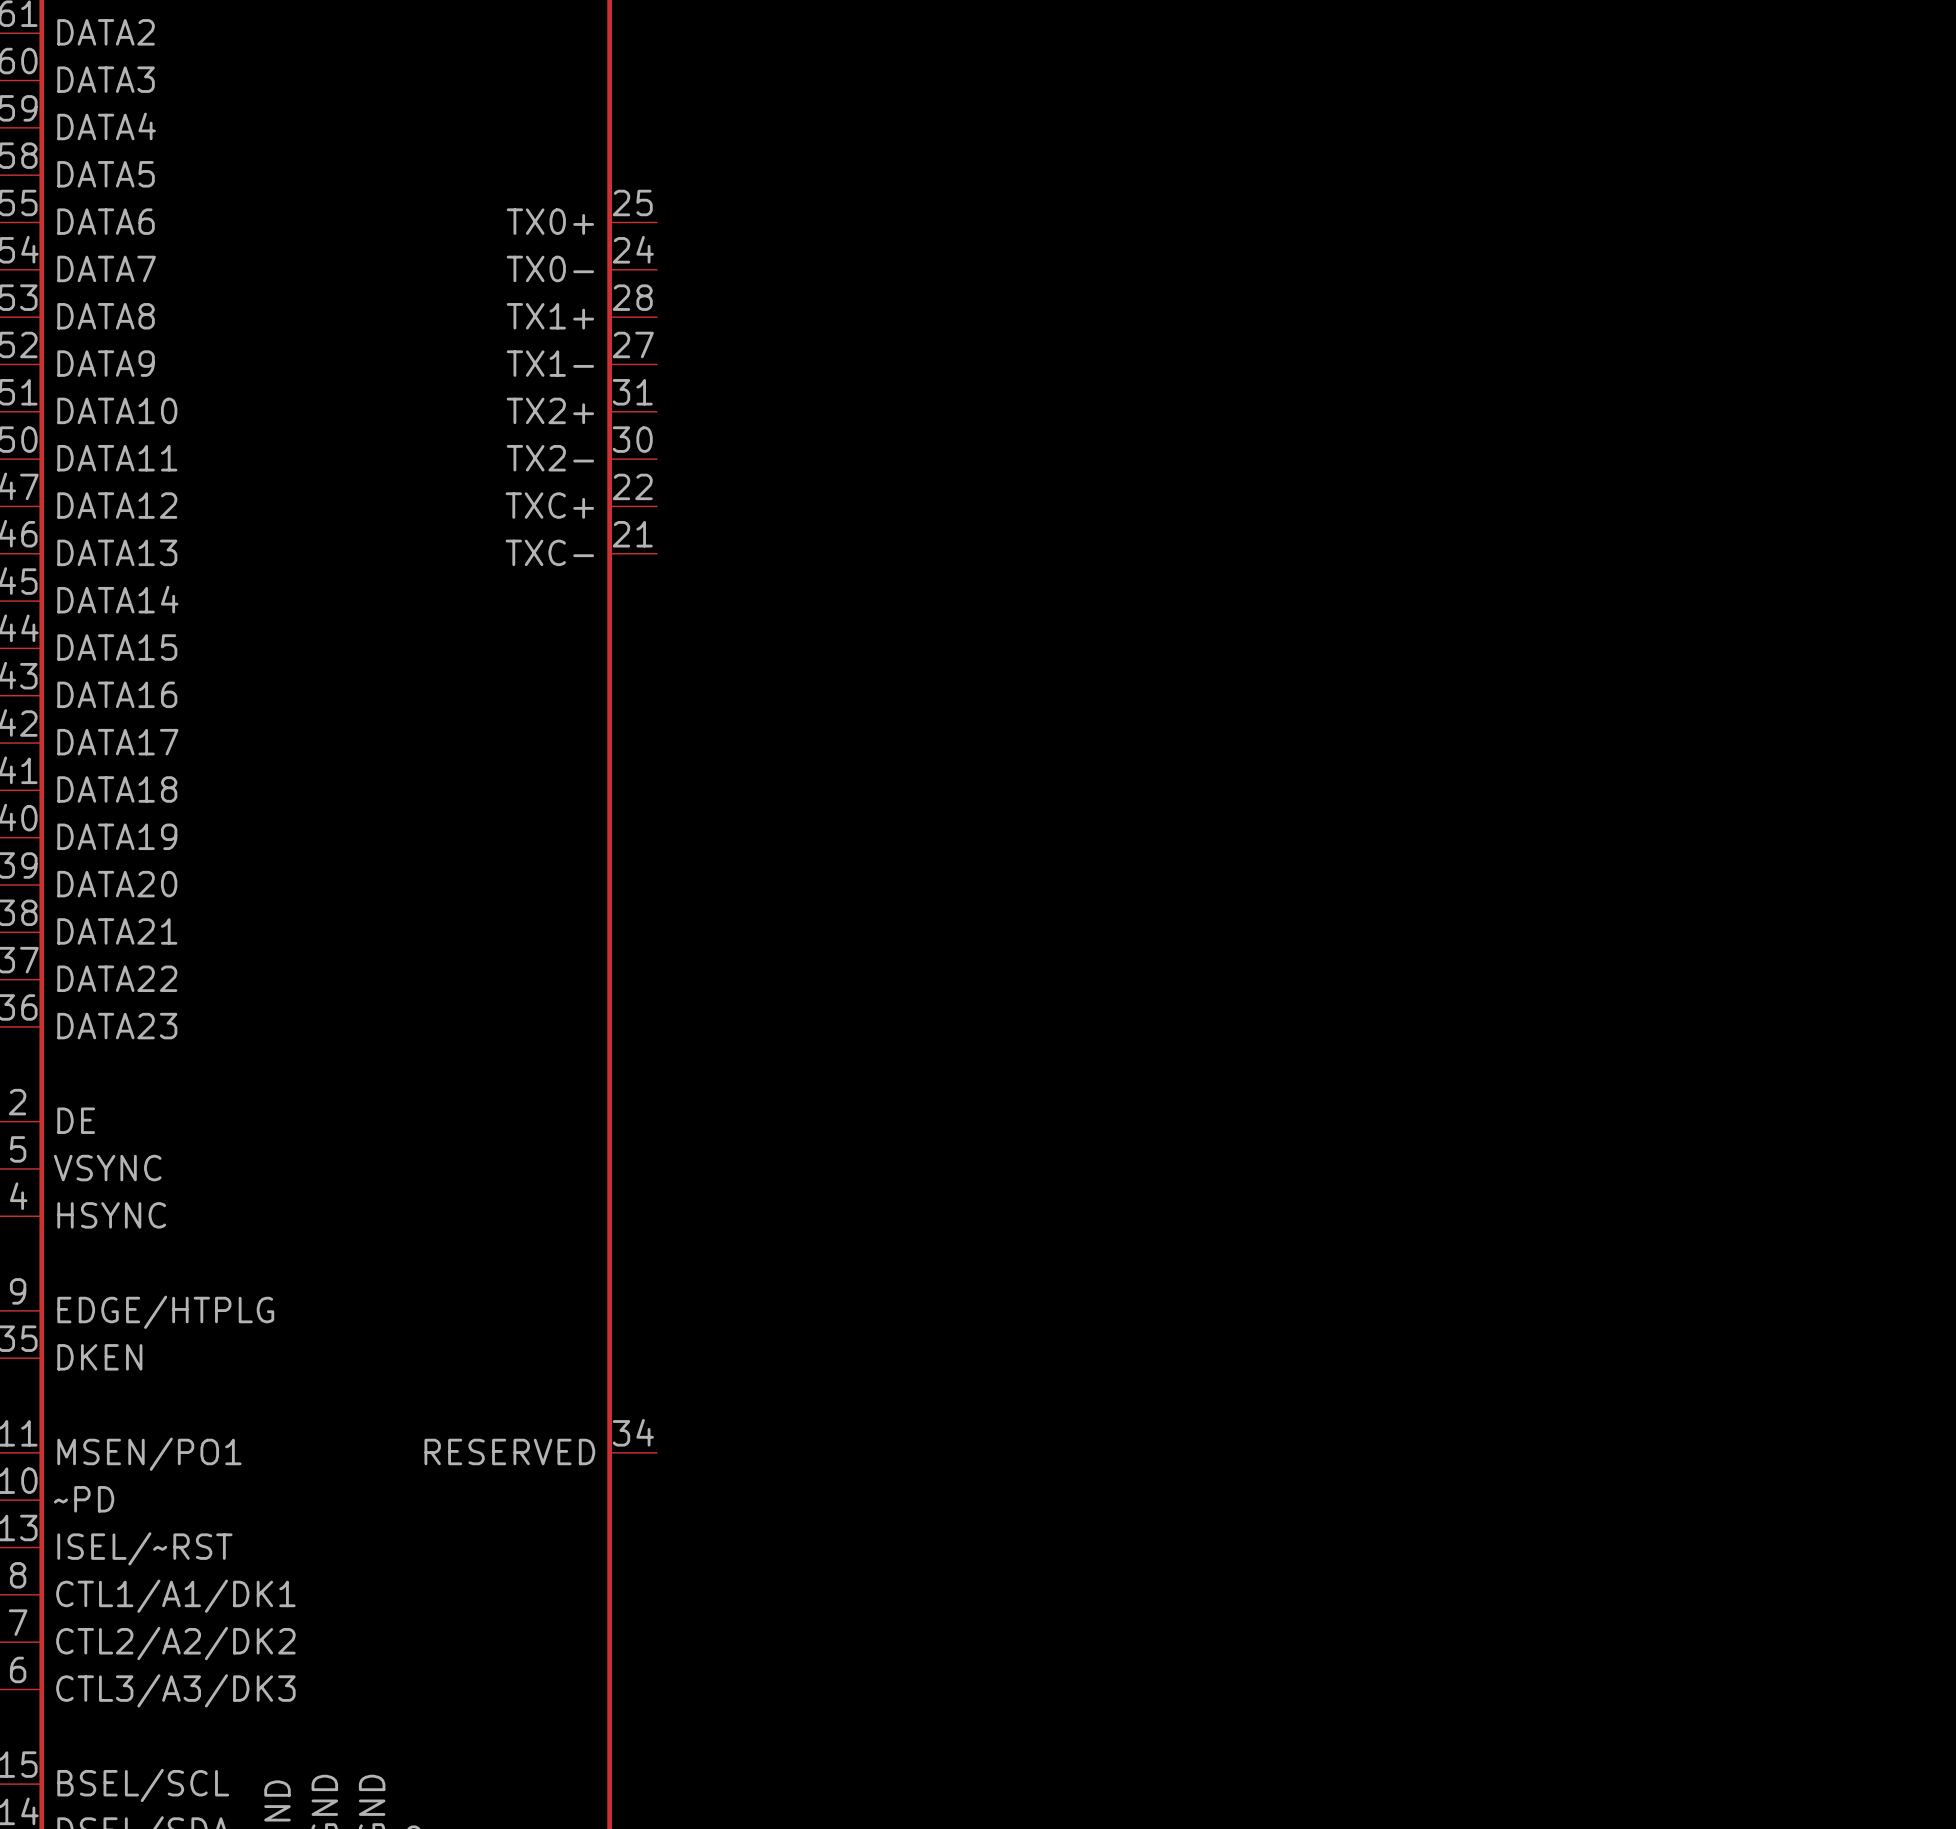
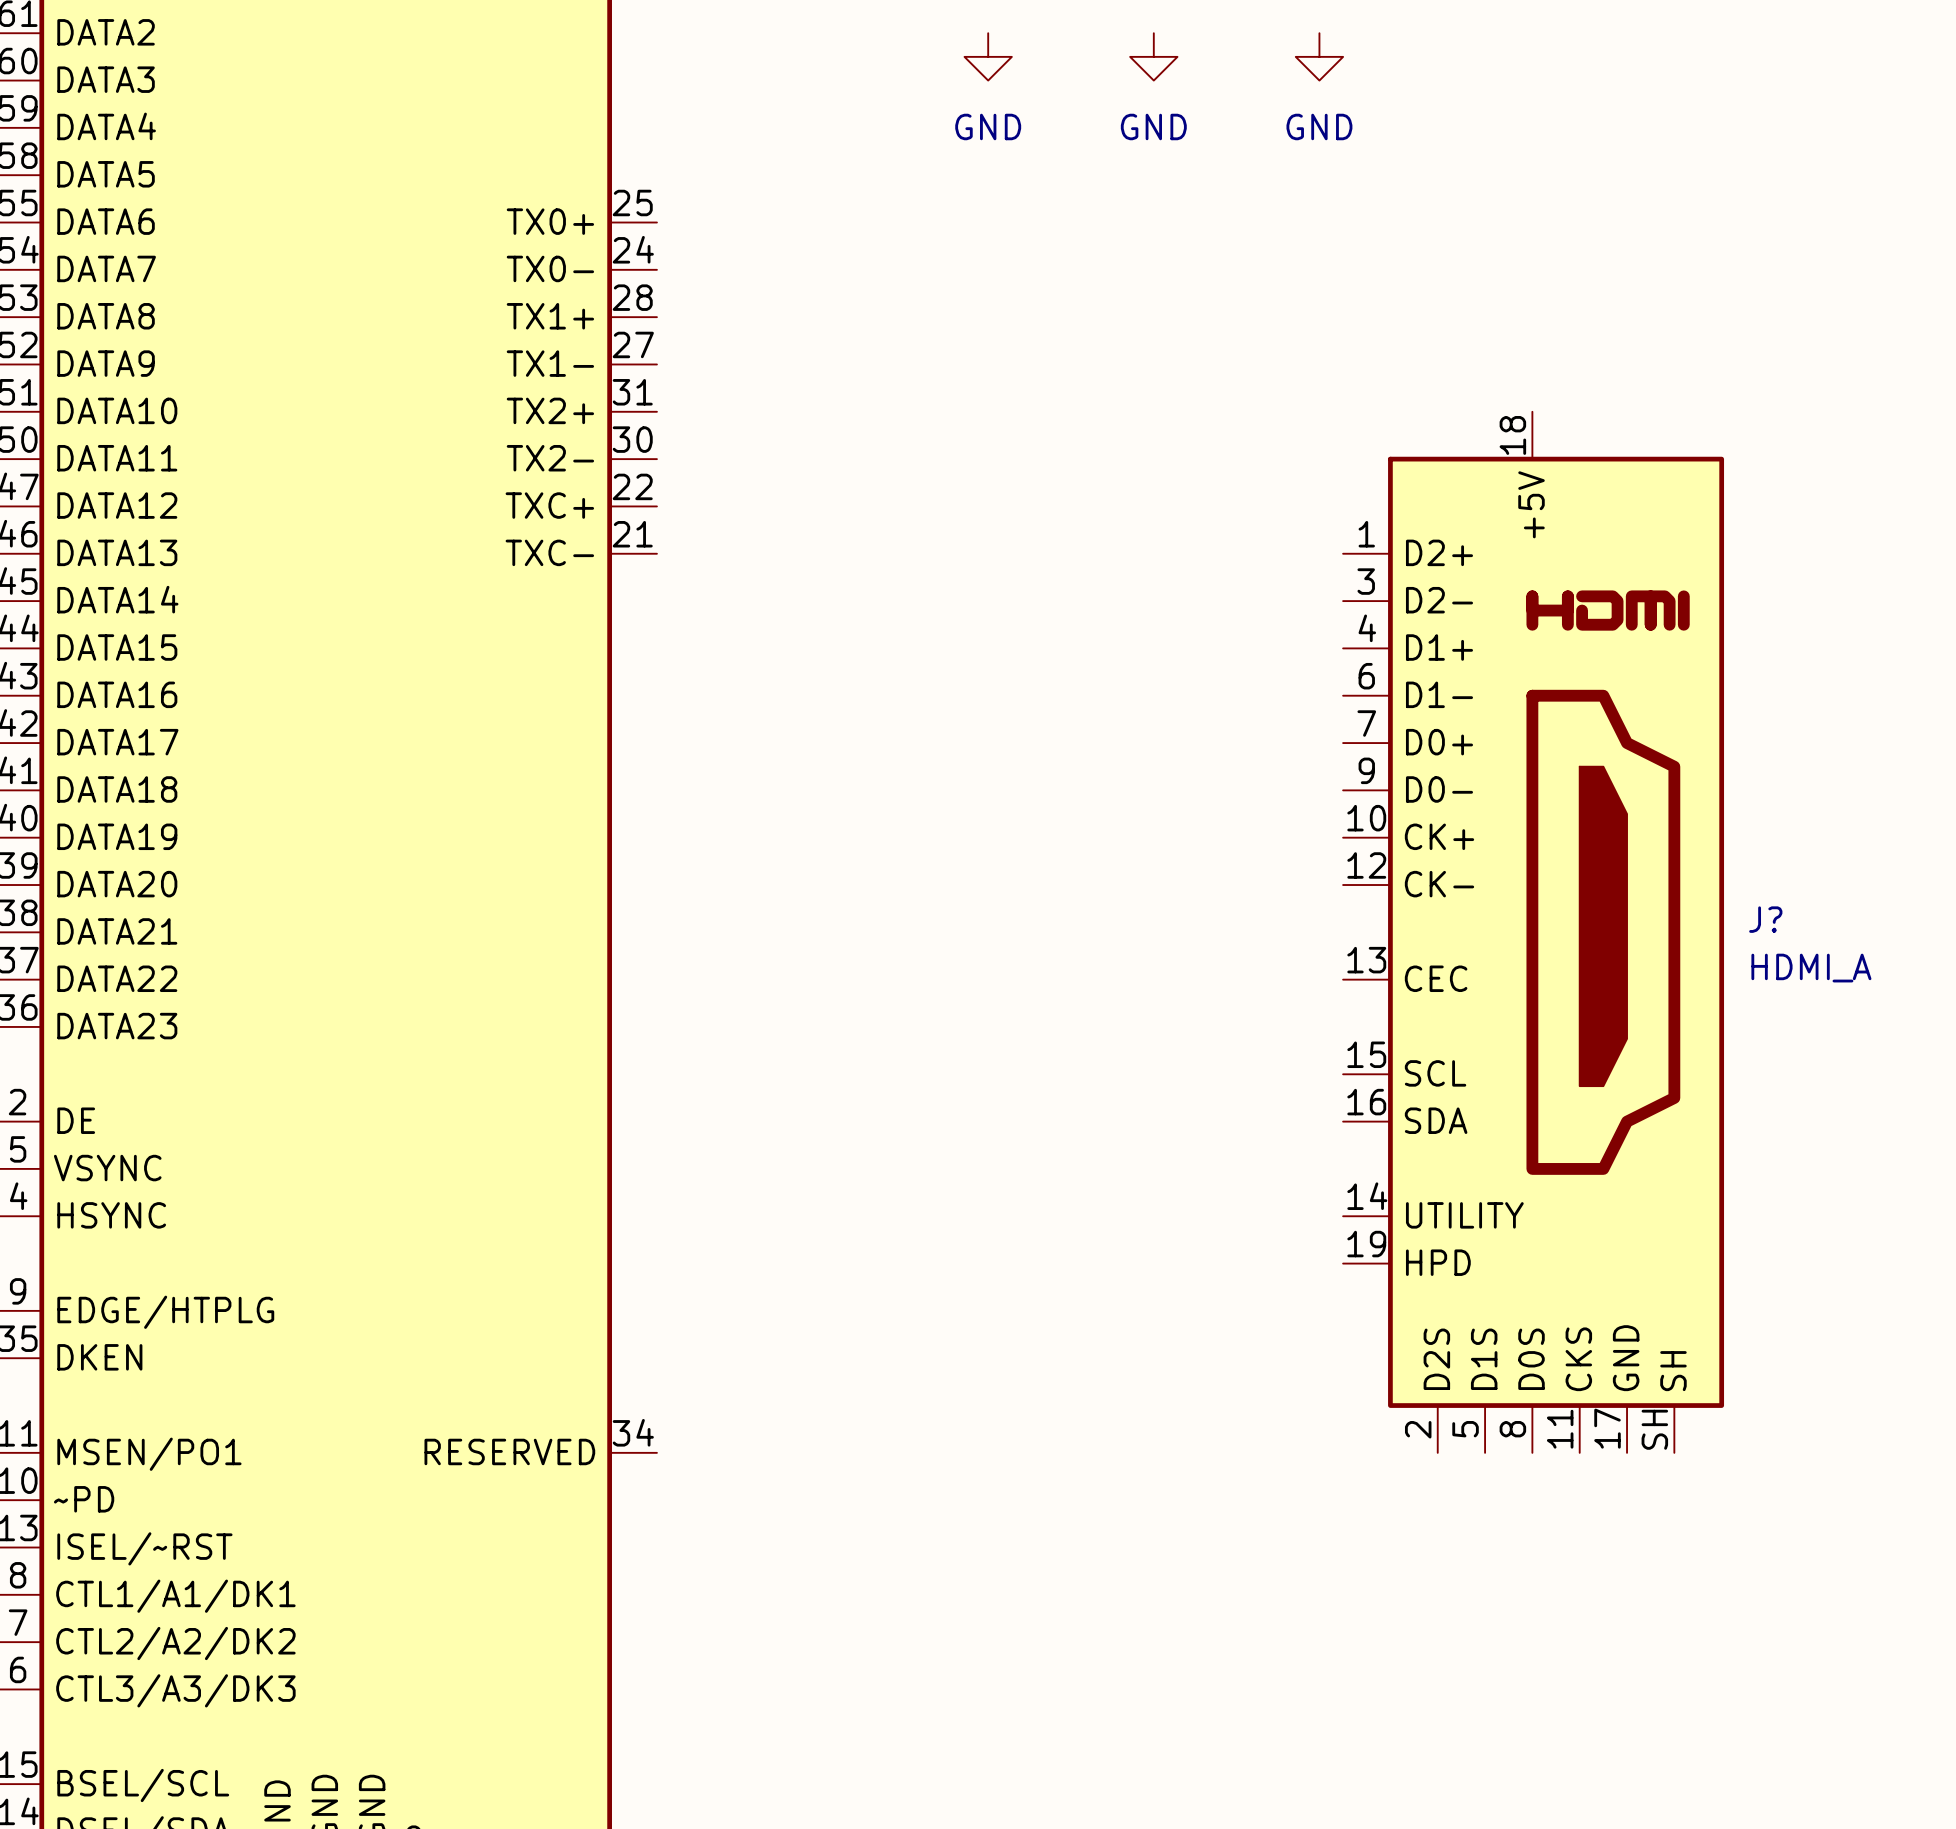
power symbol: none -> GND (988, 56)
power symbol: none -> GND (1153, 56)
power symbol: none -> GND (1319, 56)
J?: none -> HDMI_A (1533, 932)

